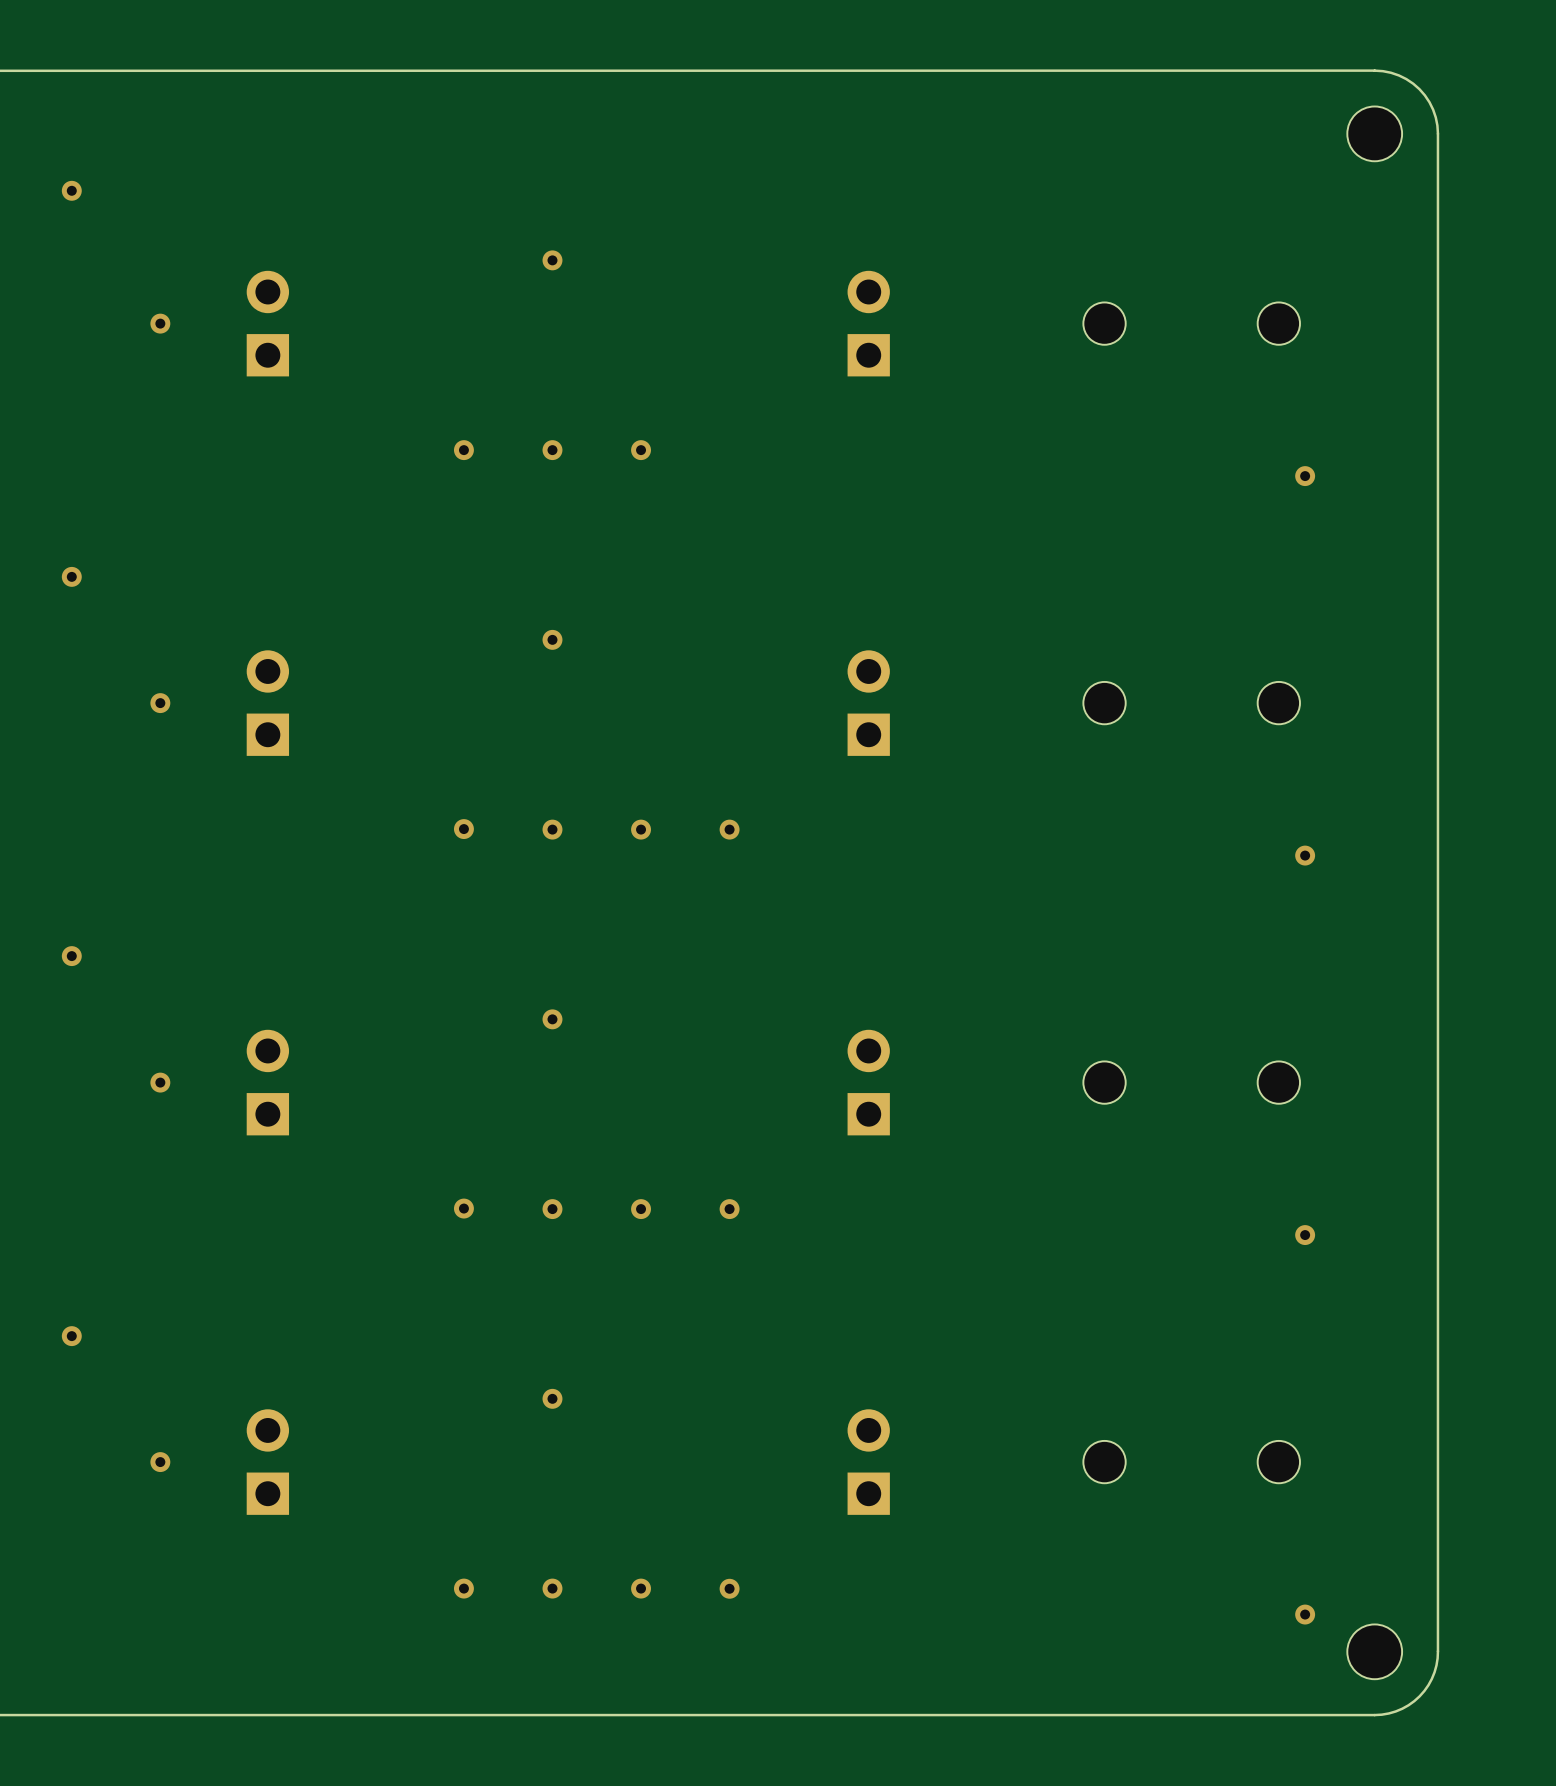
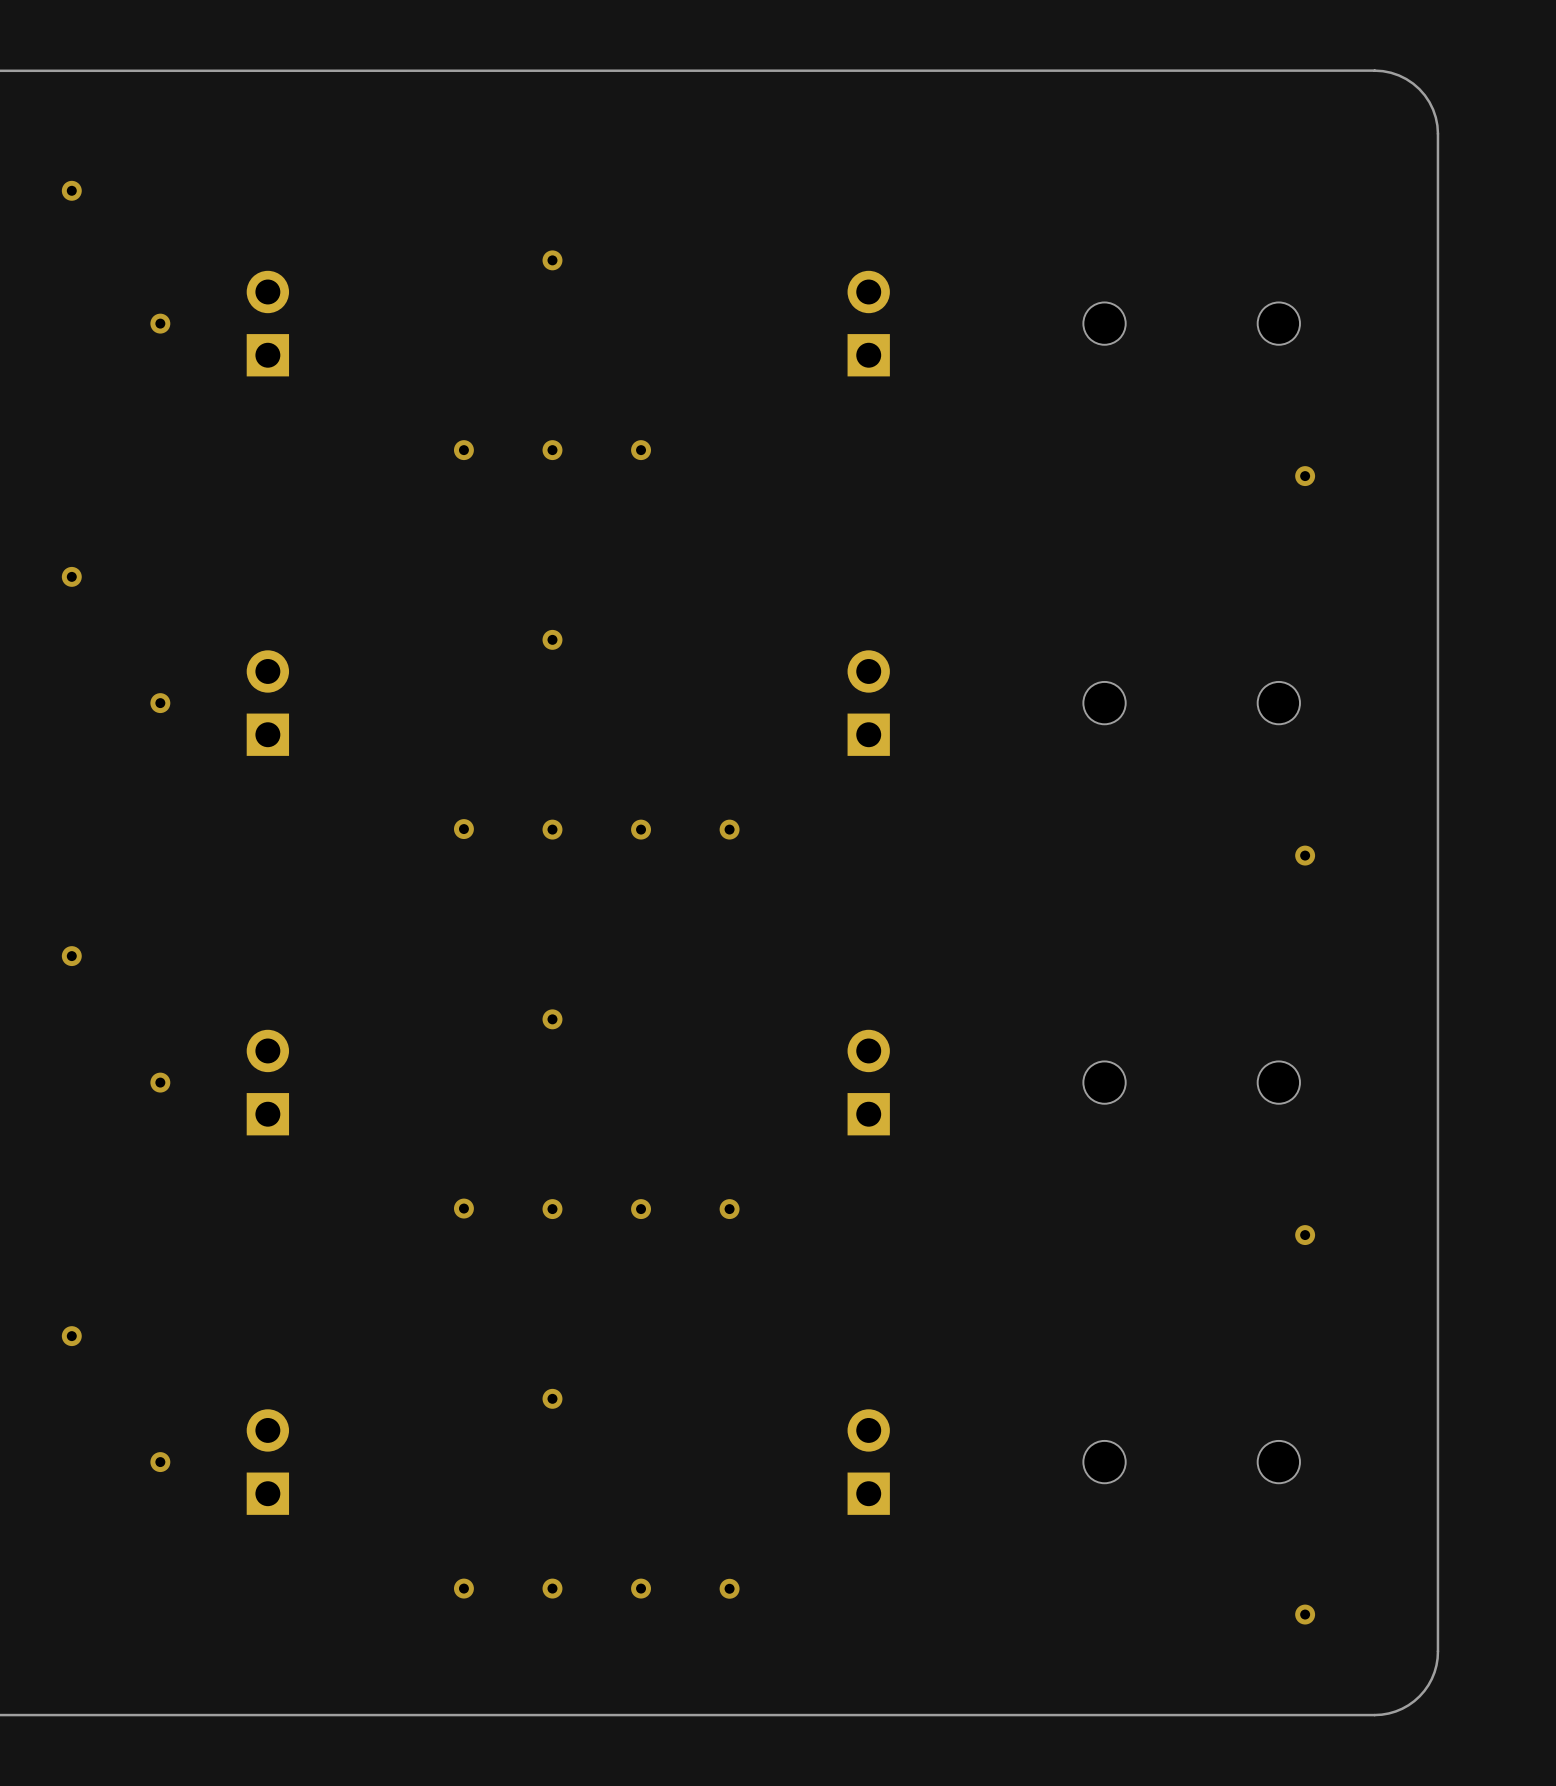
part: (1374, 133) -> none
part: (1374, 1651) -> none

